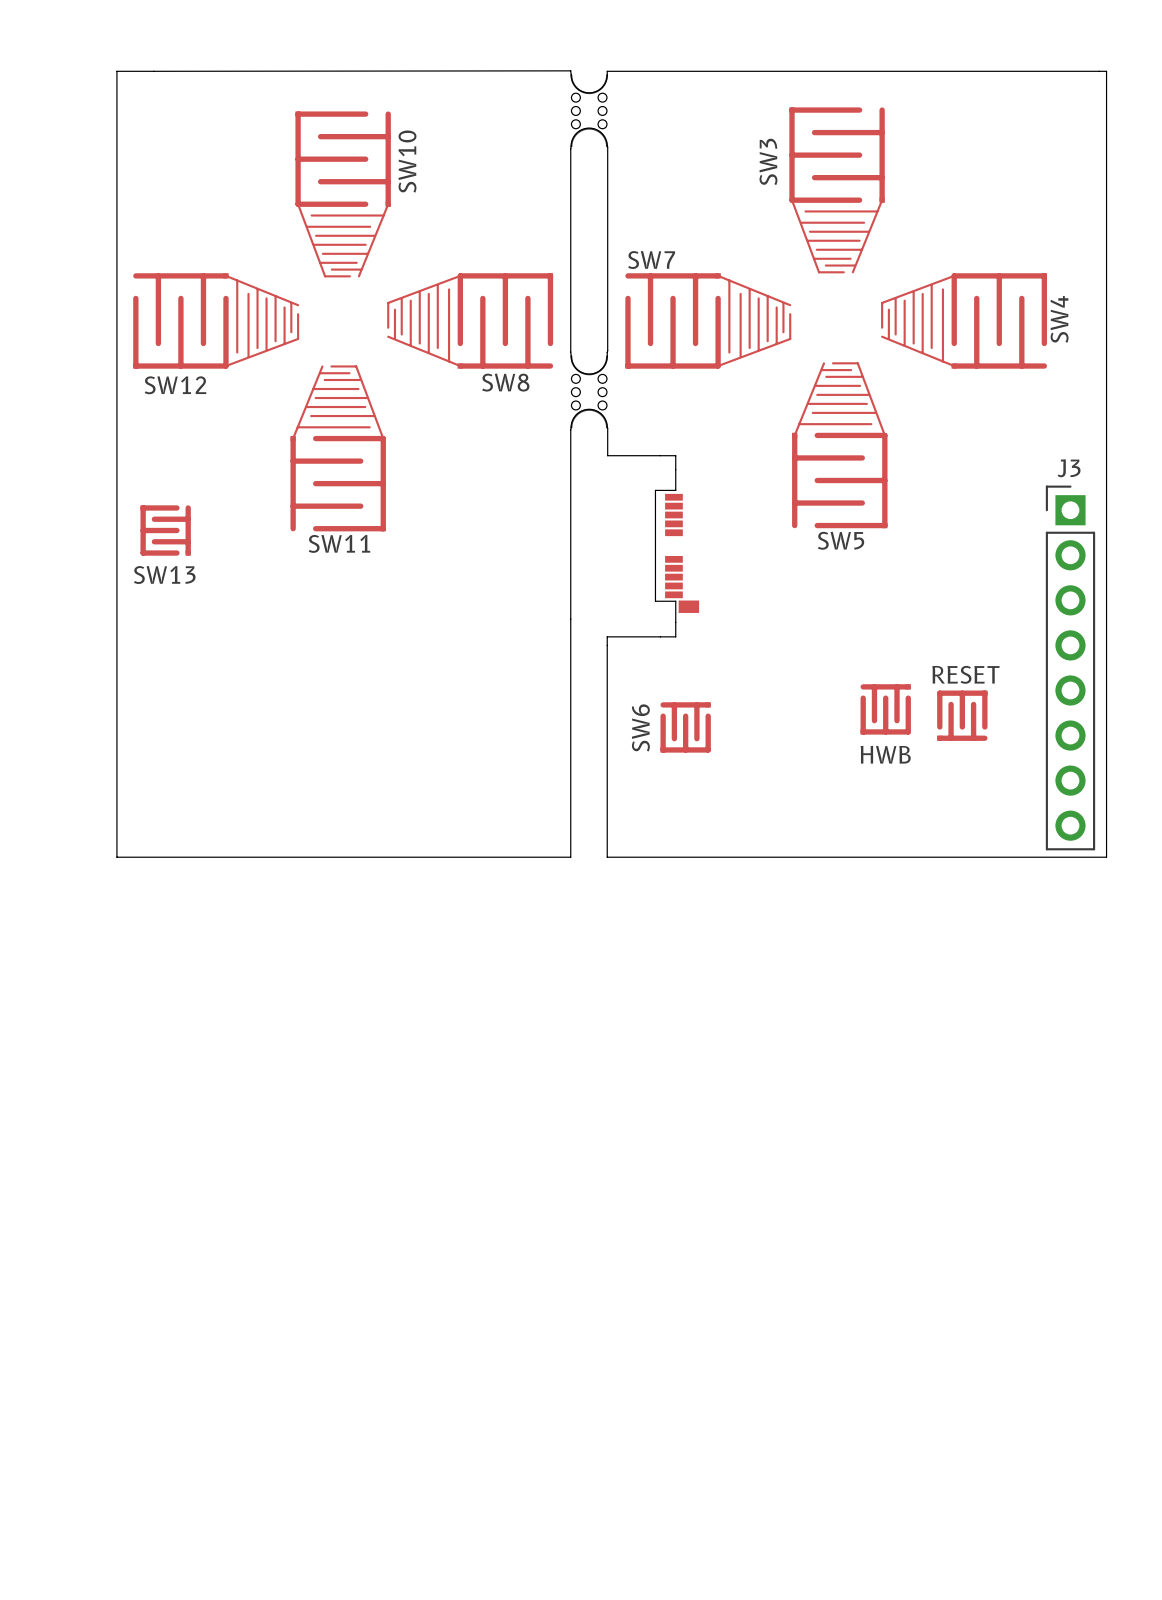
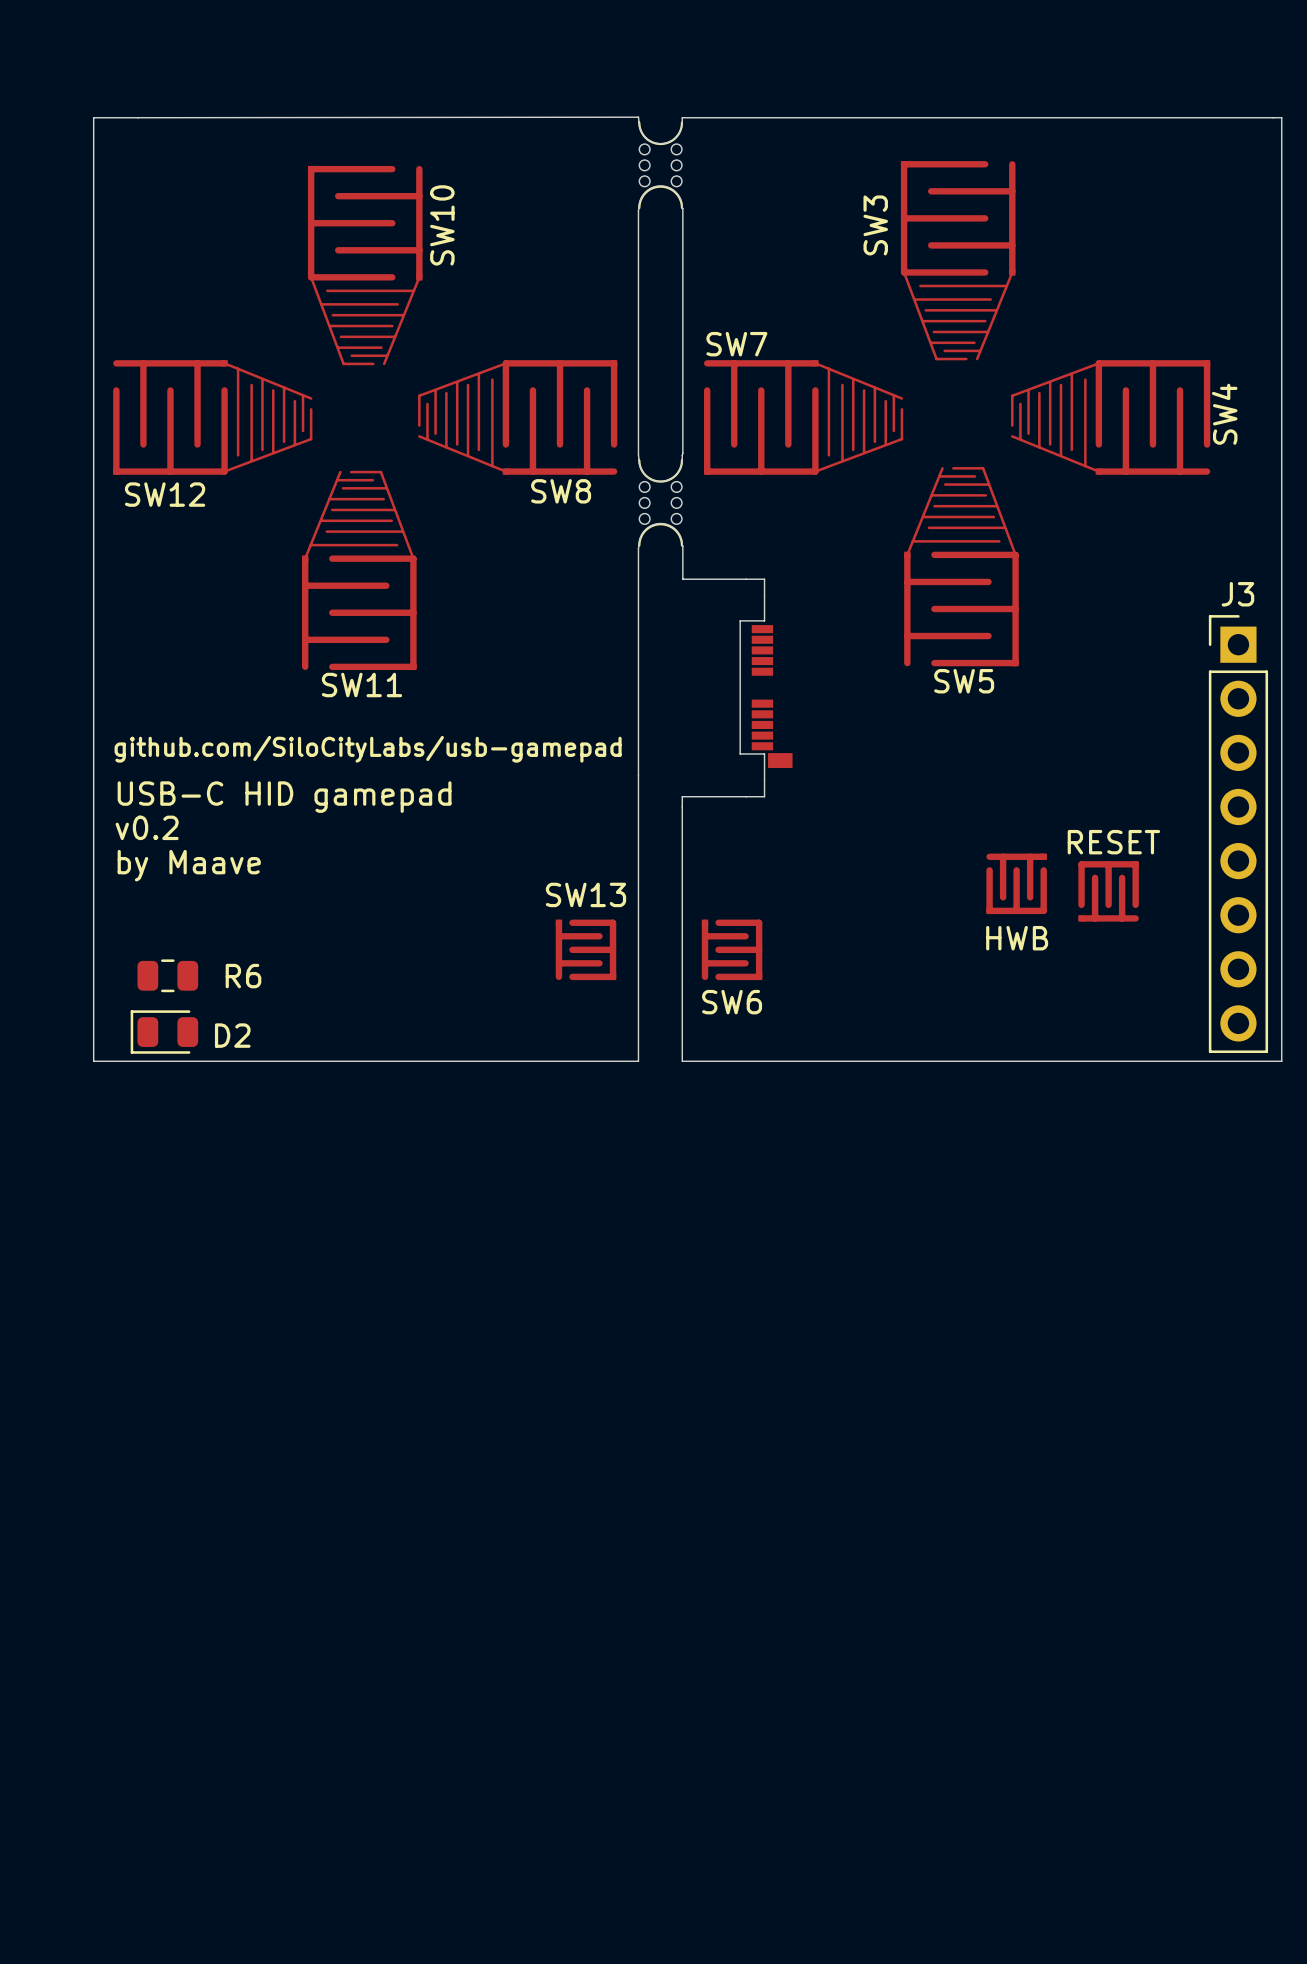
SW13 rotation: 0° (165, 530) -> 180° (585, 949)
SW13 position: (165, 530) -> (585, 949)
text: none -> github.com/SiloCityLabs/usb-gamepad (368, 749)
text: none -> USB-C HID gamepad (284, 797)
text: none -> v0.2 (147, 827)
text: none -> by Maave (189, 865)
SW6 rotation: 0° (685, 727) -> 90° counterclockwise (732, 949)
SW6 position: (685, 727) -> (732, 949)
R6: none -> (167, 975)
D2: none -> (164, 1032)

